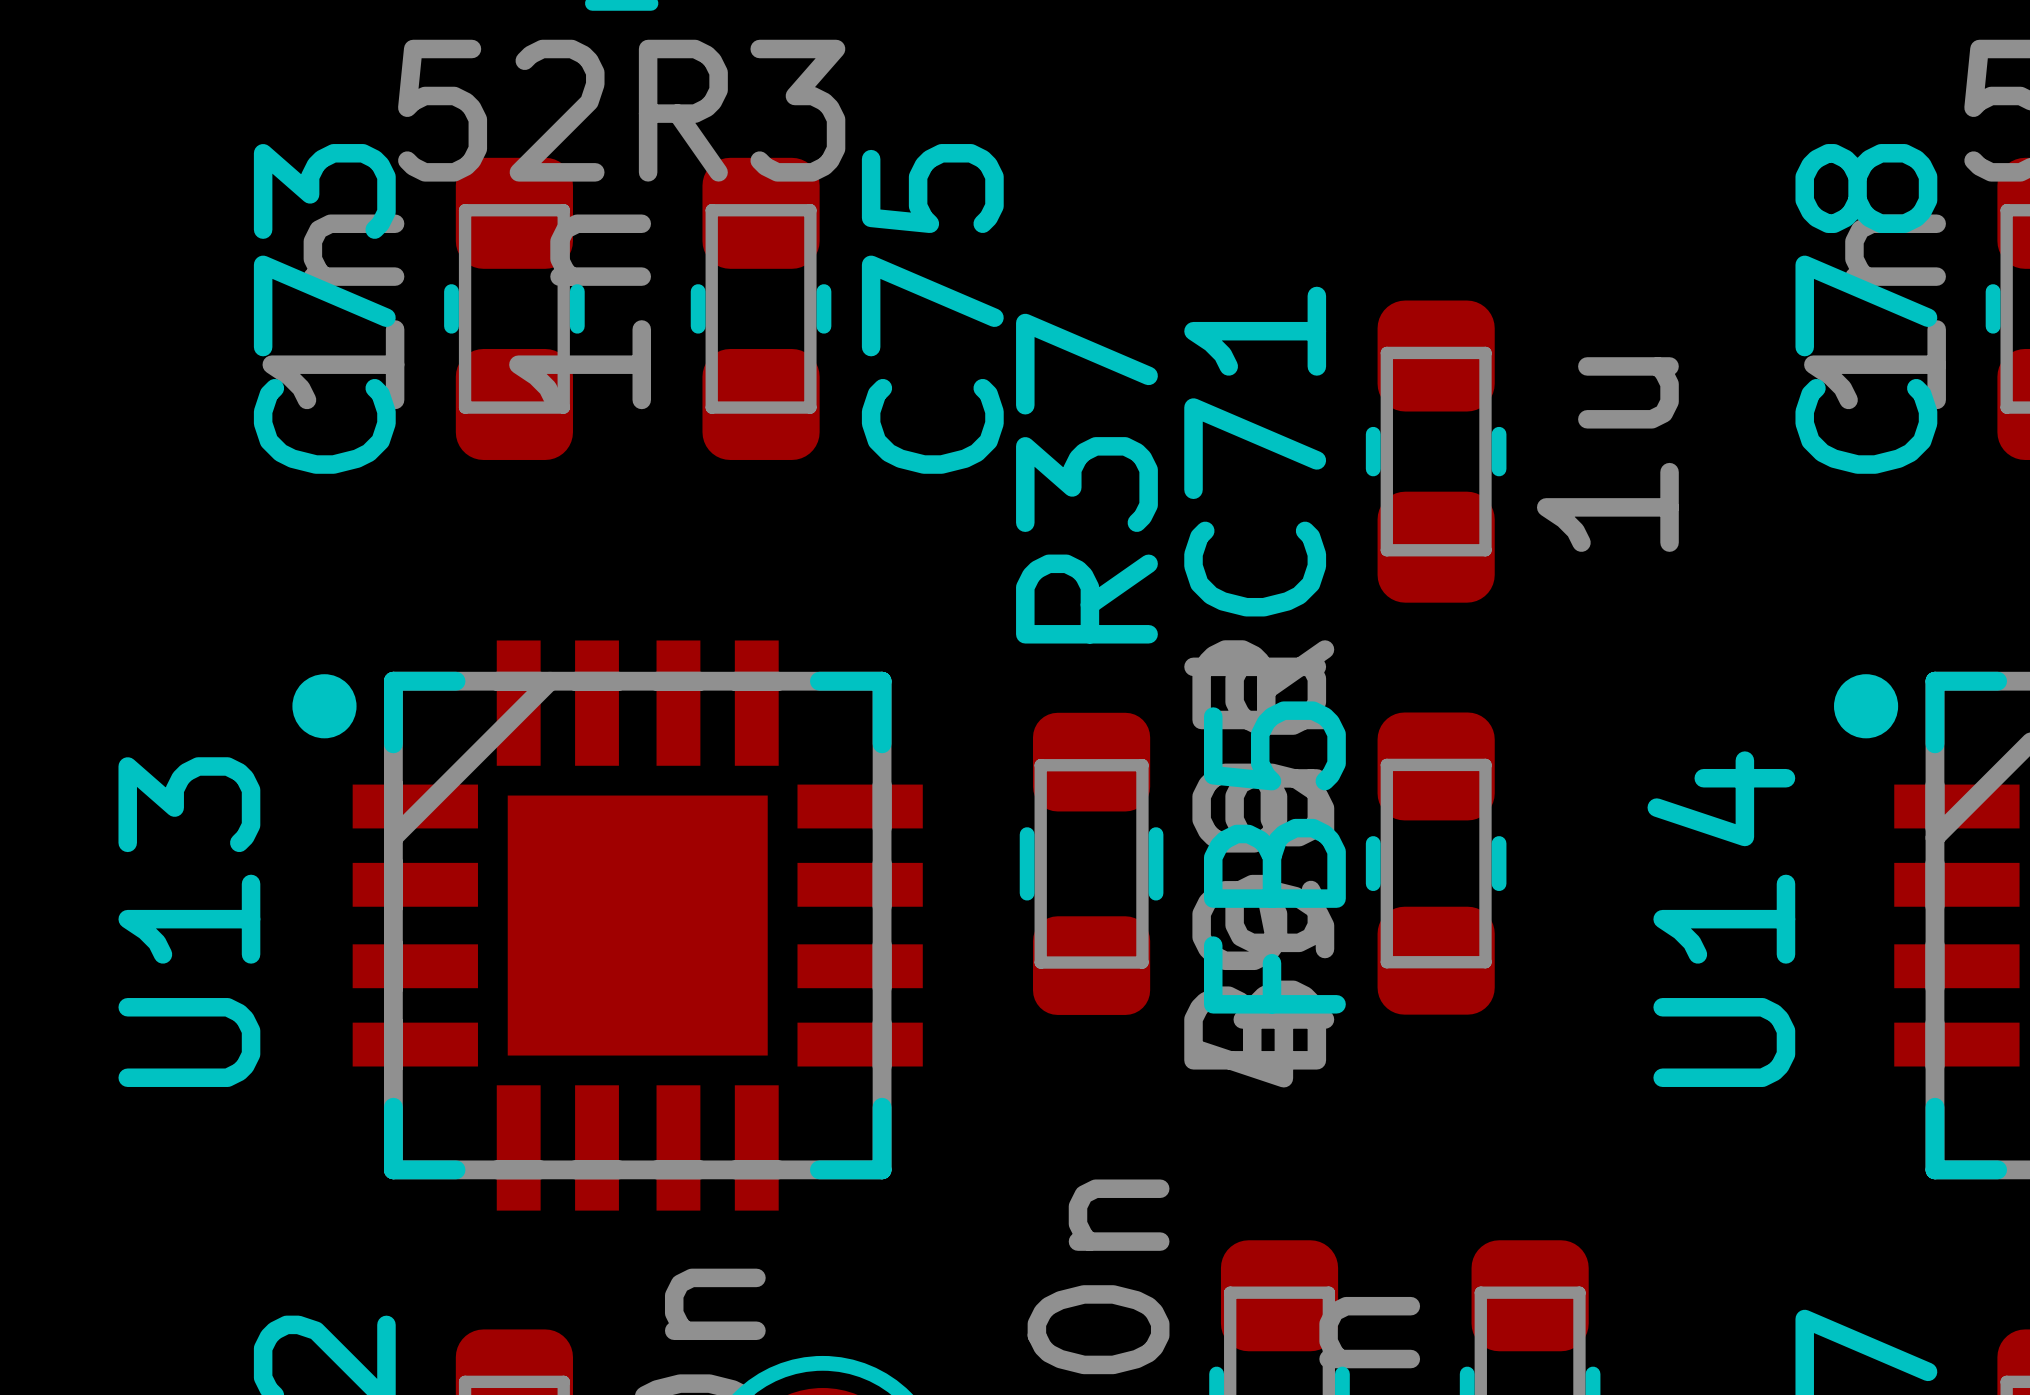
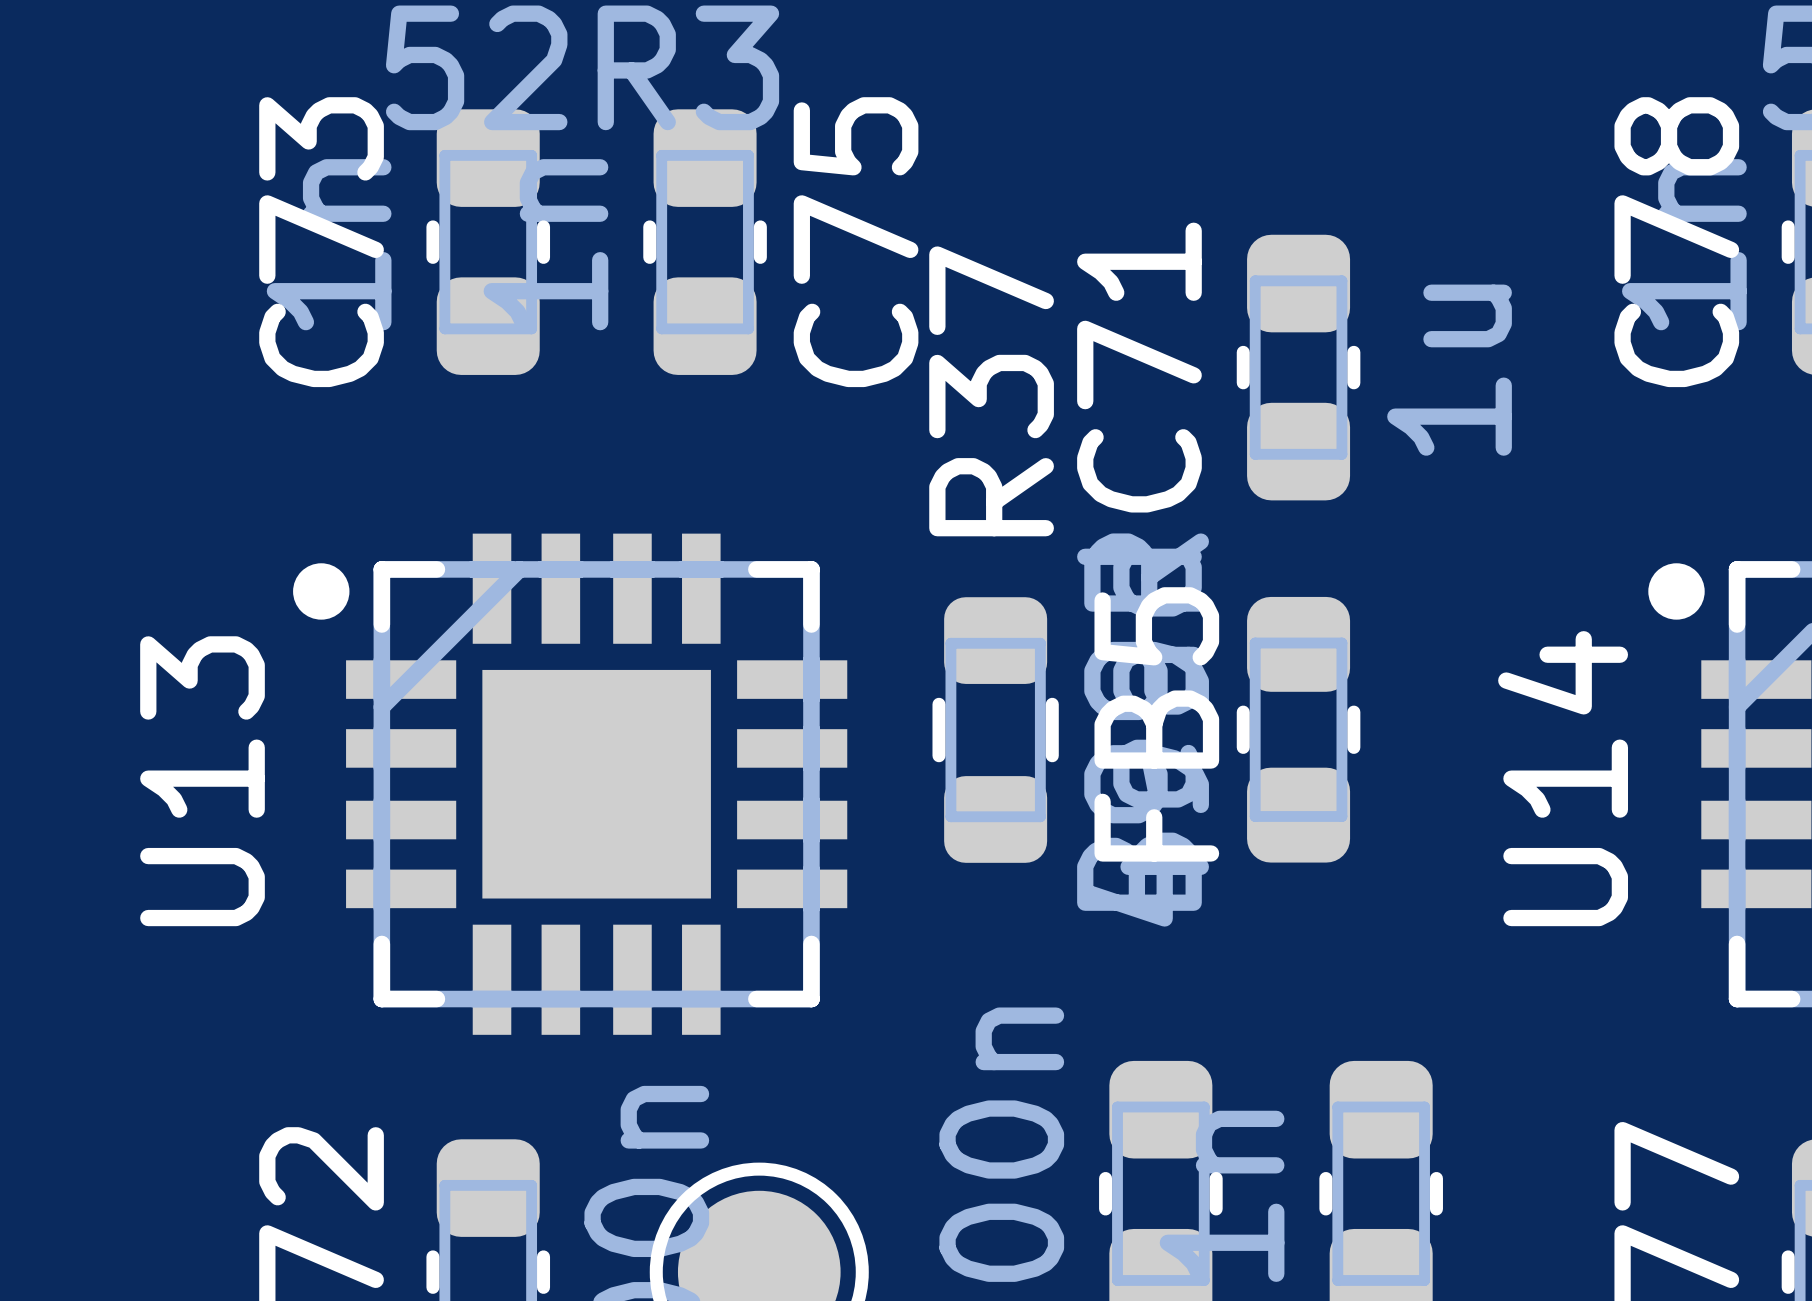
U14 name position: U14 (1721, 919) -> U14 (1563, 778)

